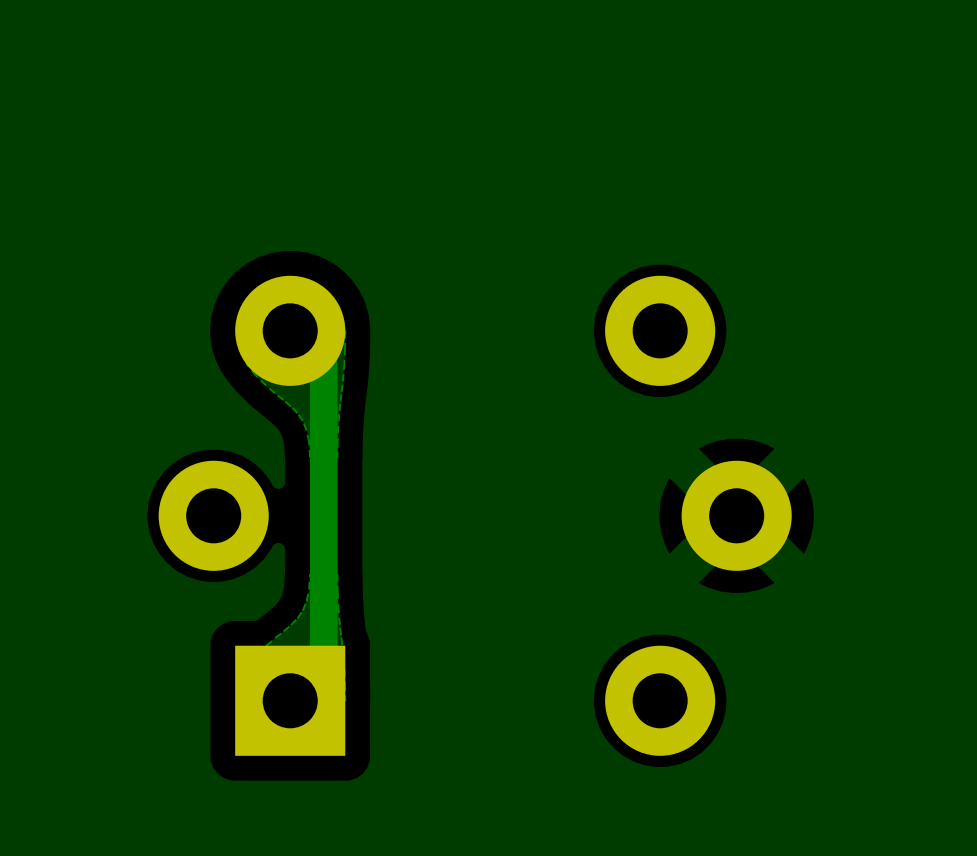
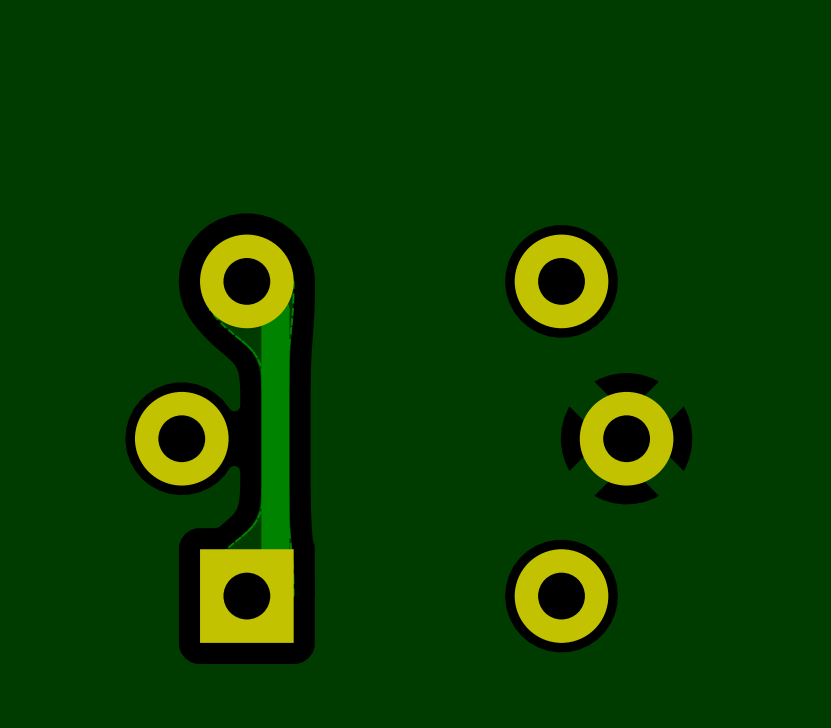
track width: thin (290, 330) (323, 364) (323, 667) (290, 700) -> thick (246, 281) (275, 309) (275, 567) (246, 596)

